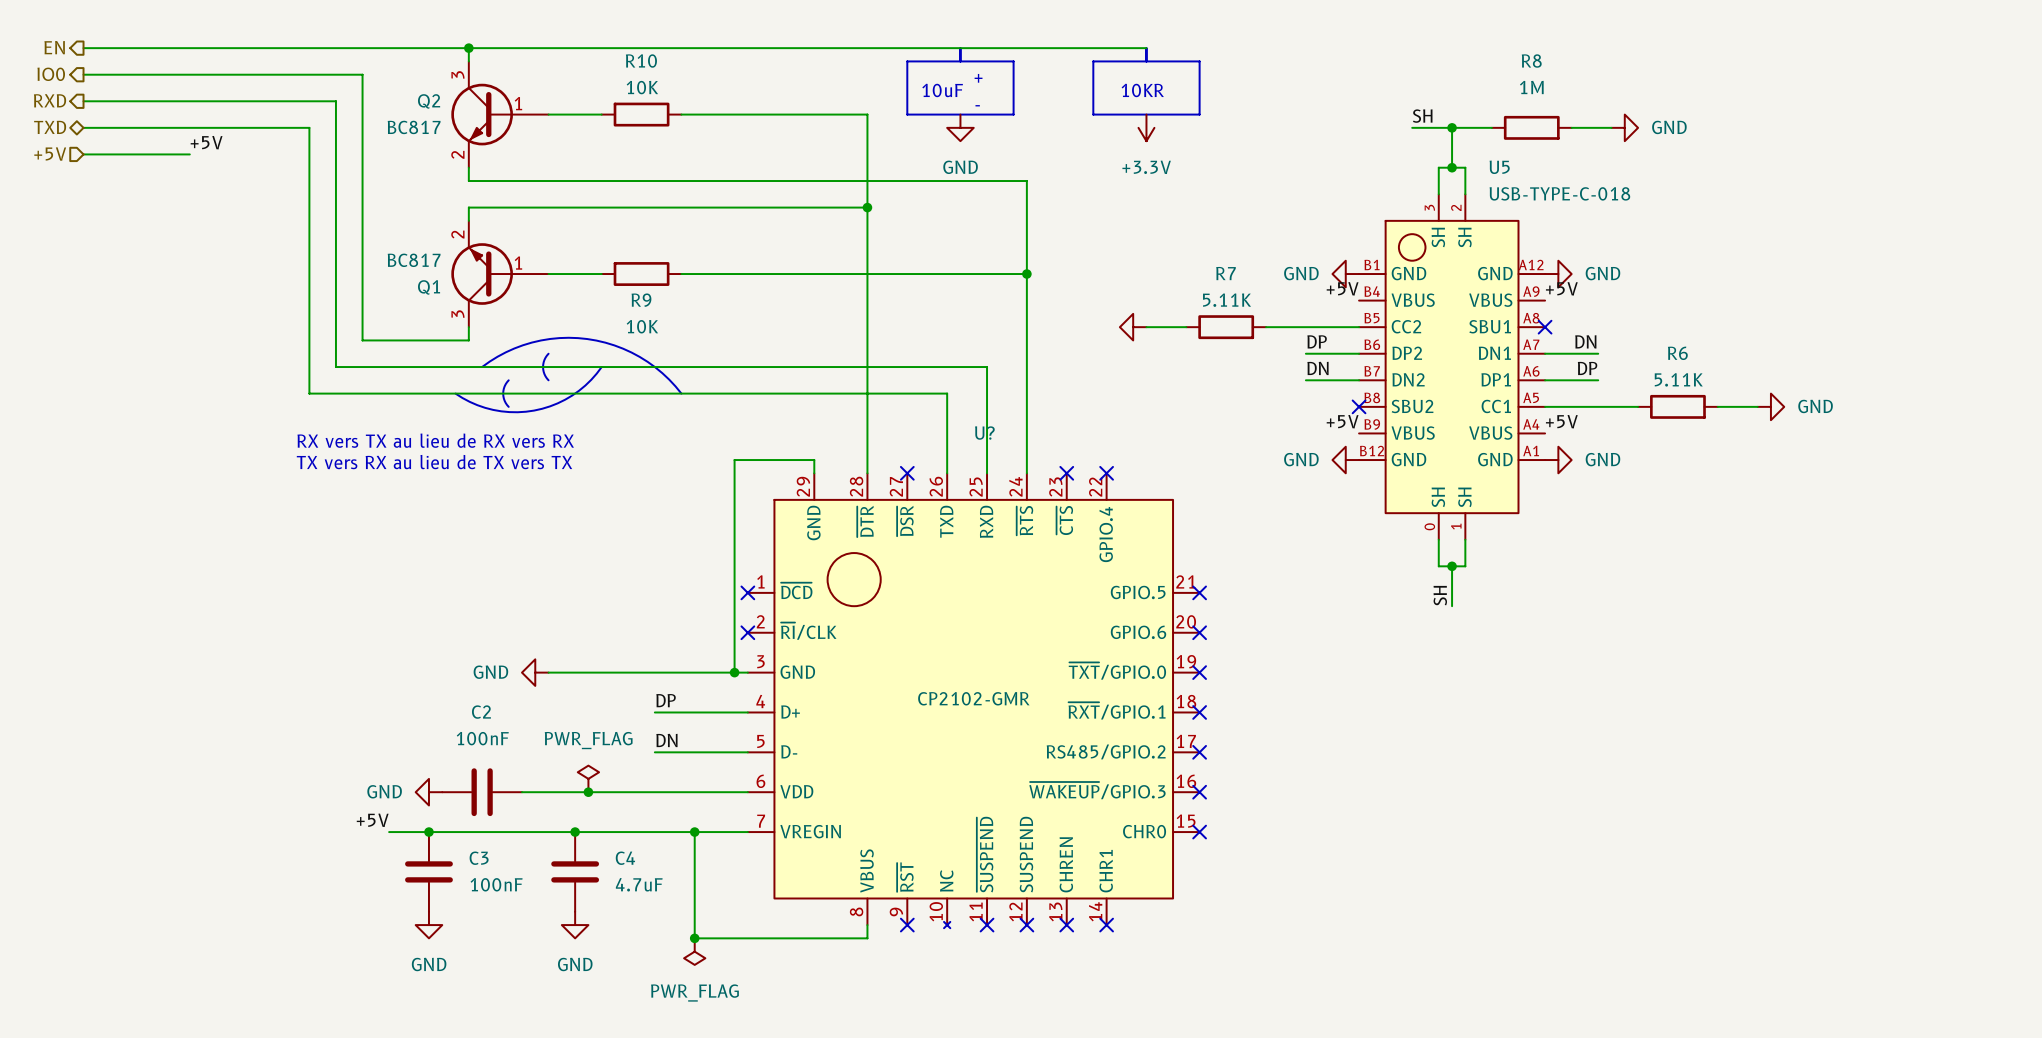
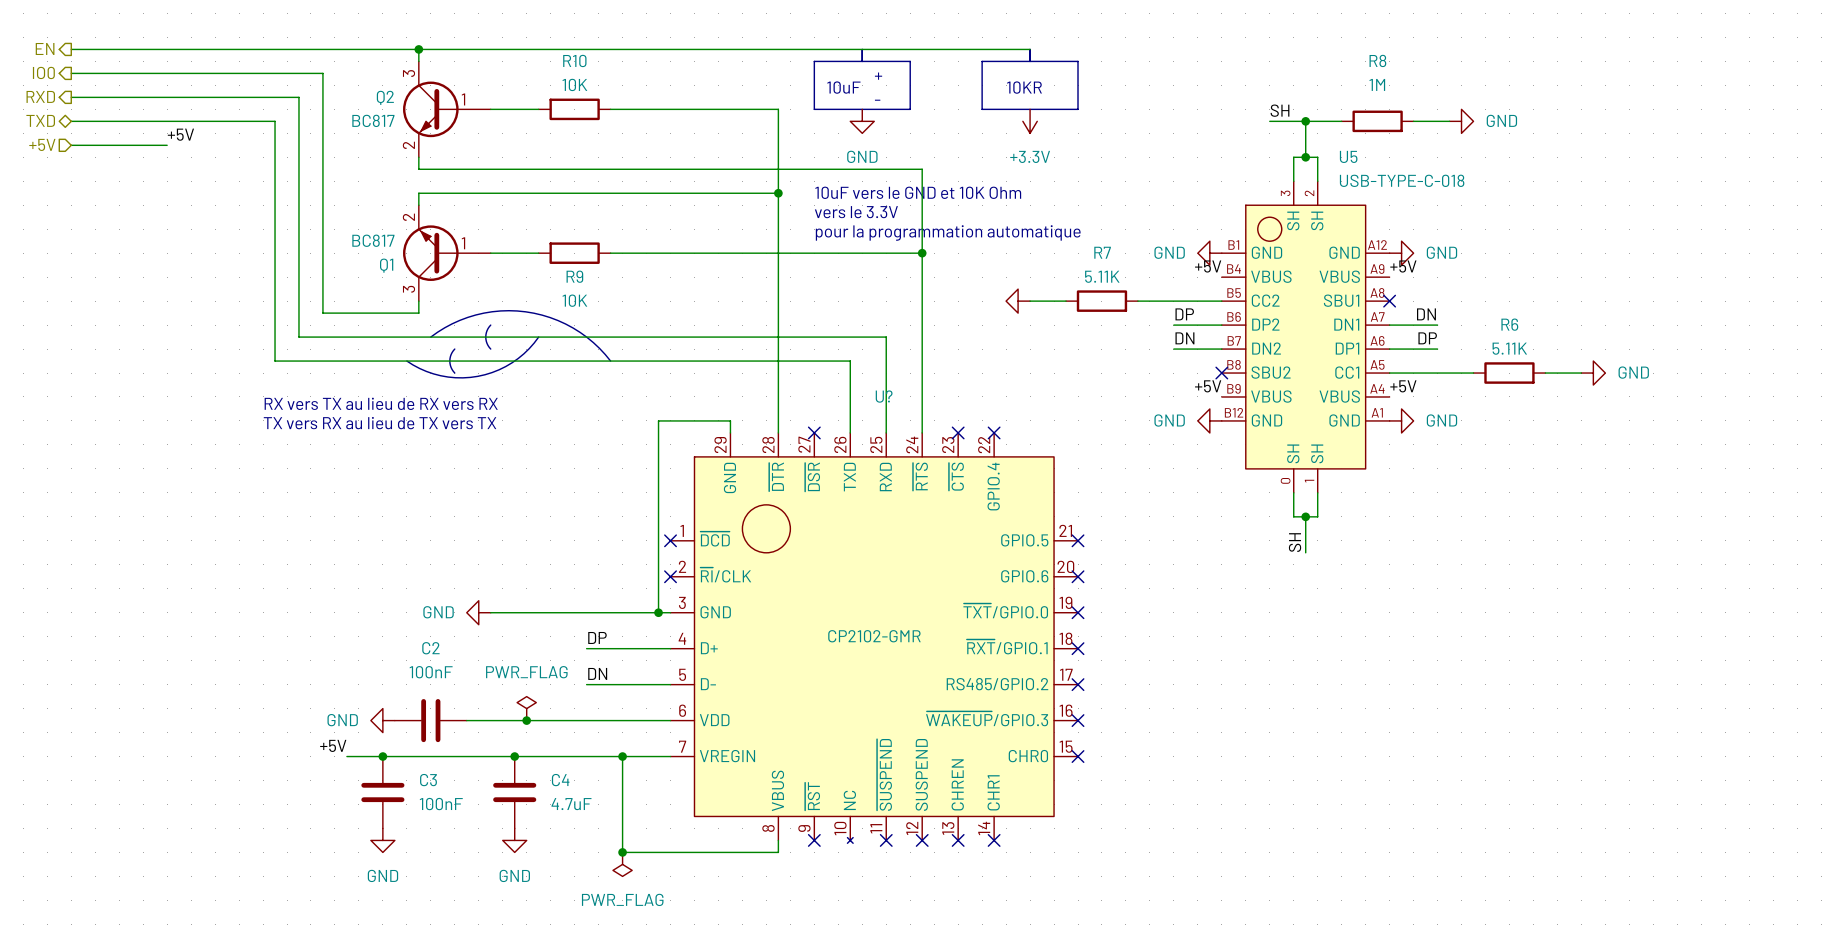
text: none -> 10uF vers le GND et 10K Ohm (918, 192)
text: none -> vers le 3.3V (856, 212)
text: none -> pour la programmation automatique (948, 232)

